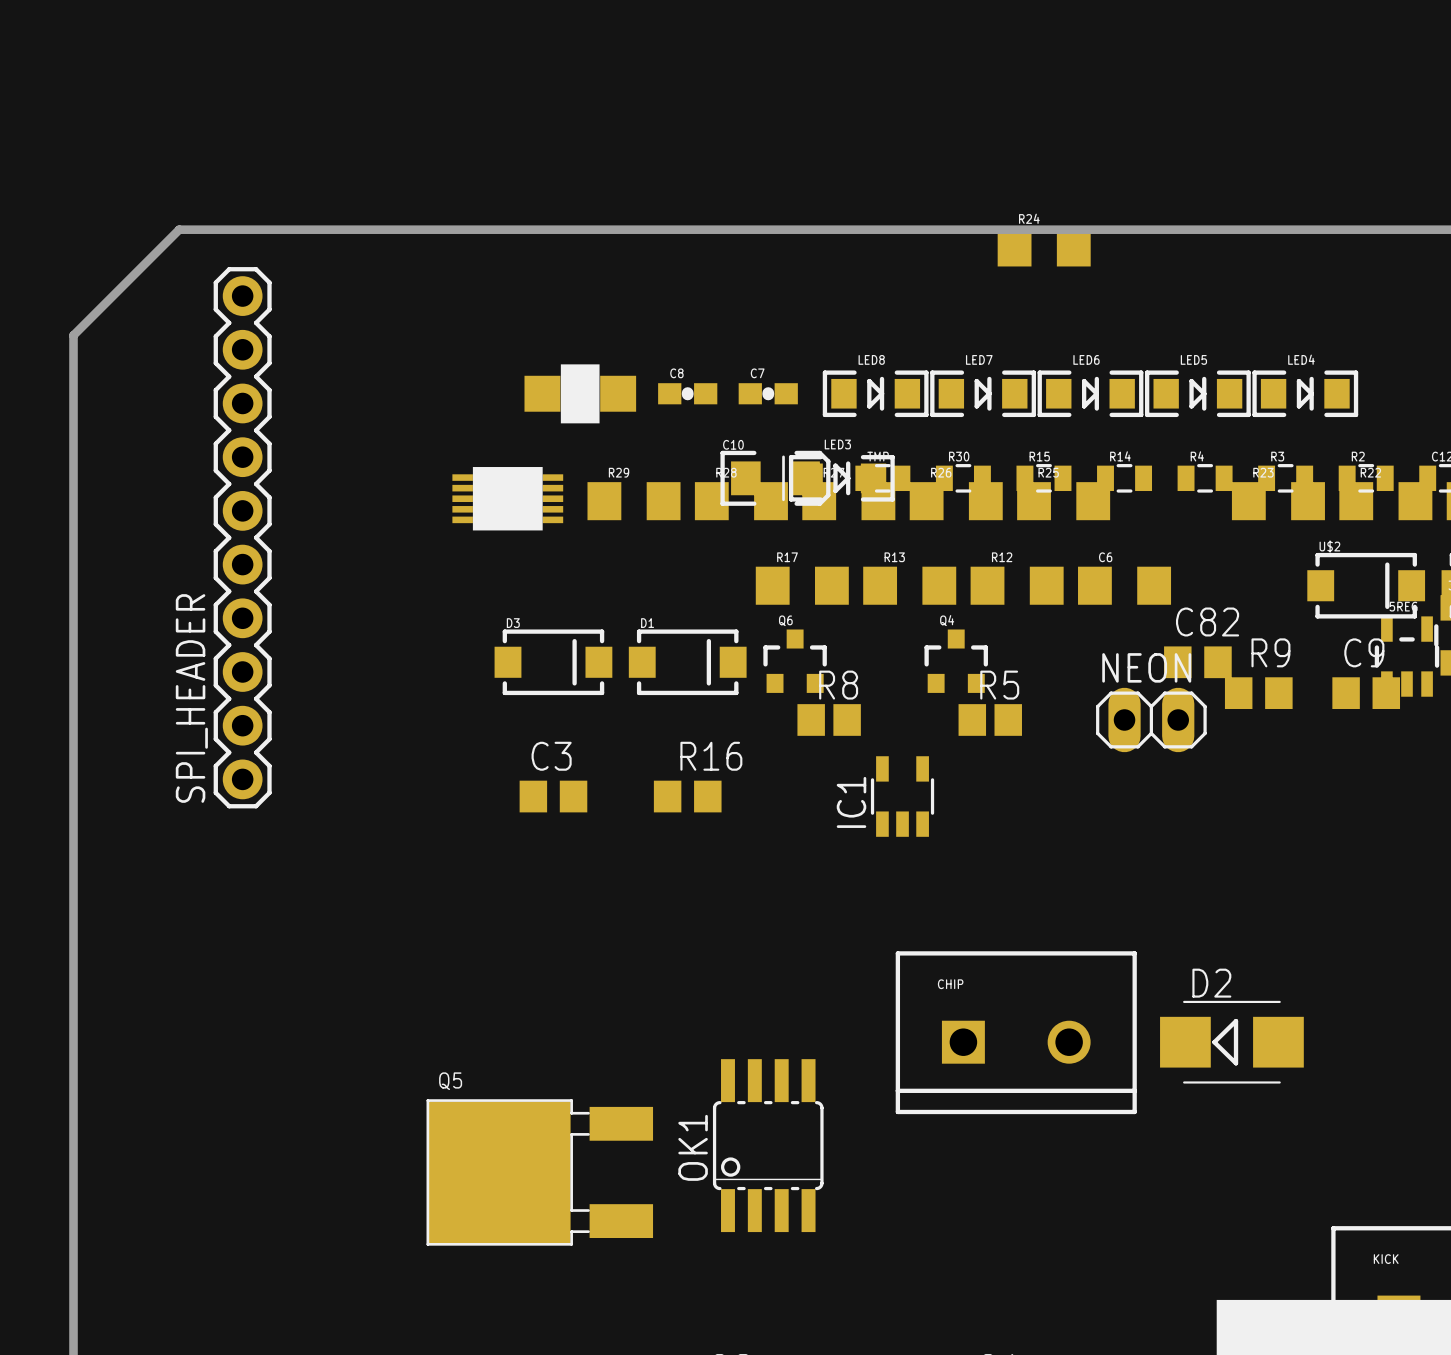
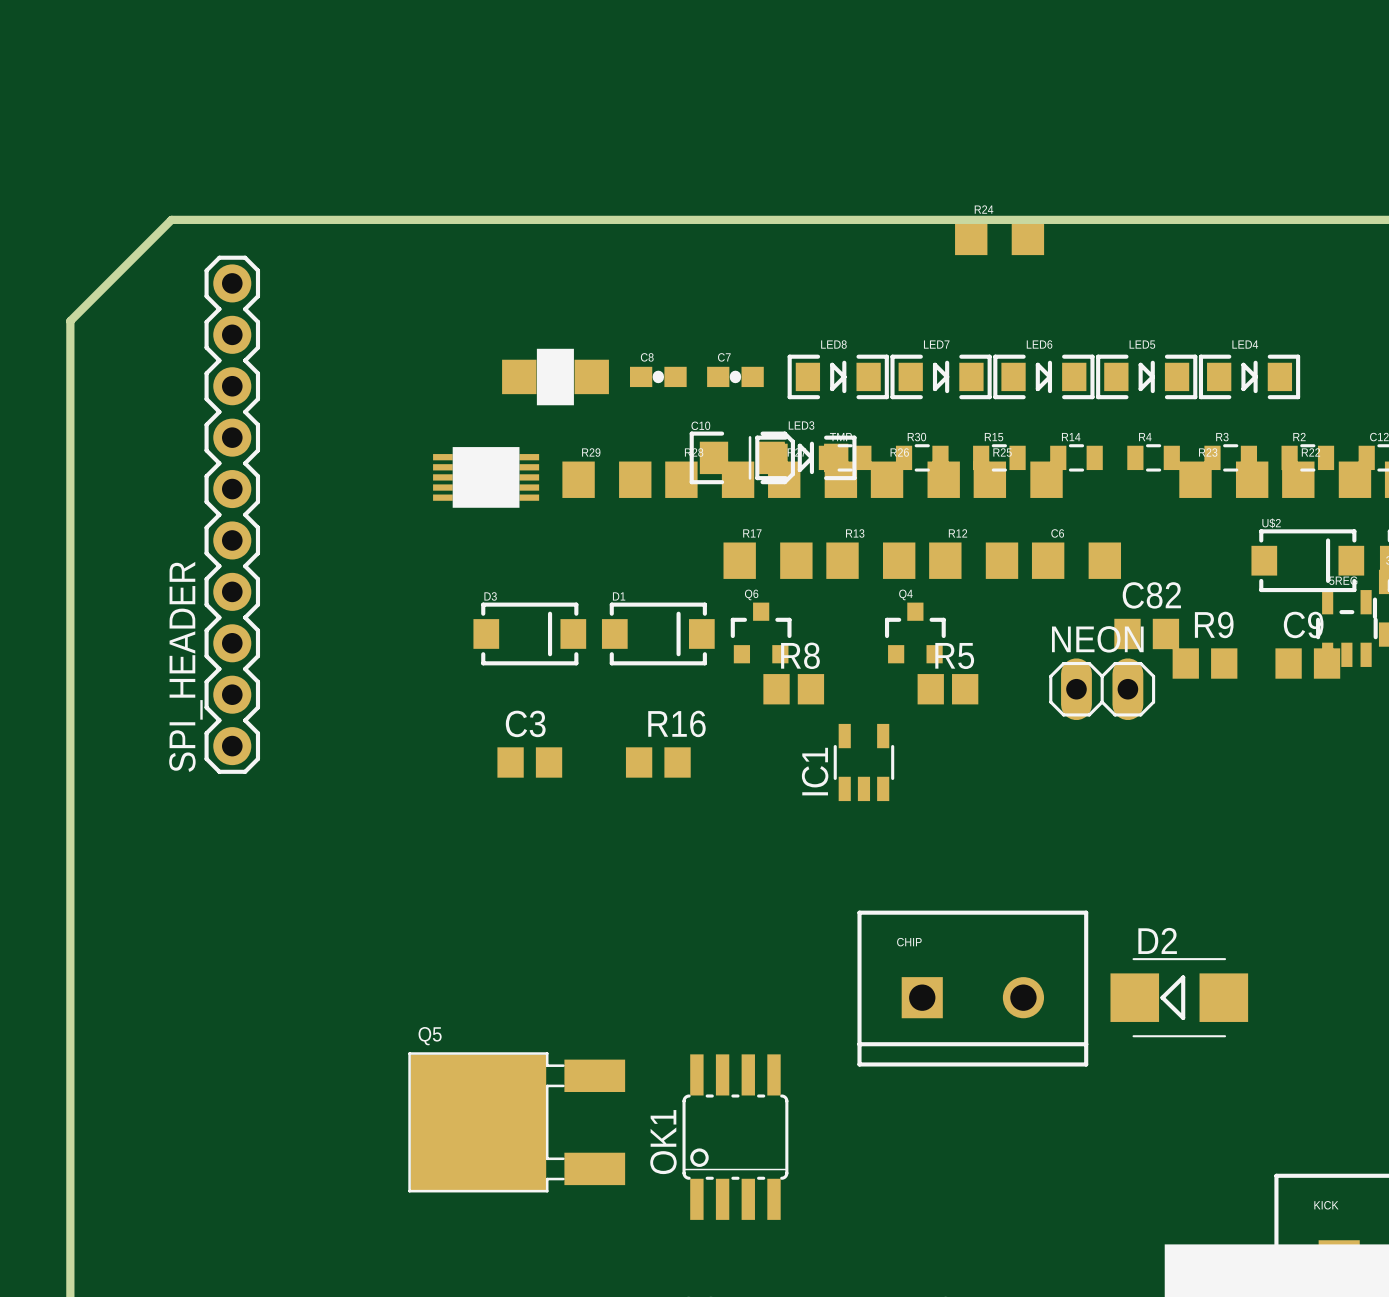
OK1 position: (768, 1145) -> (735, 1137)

